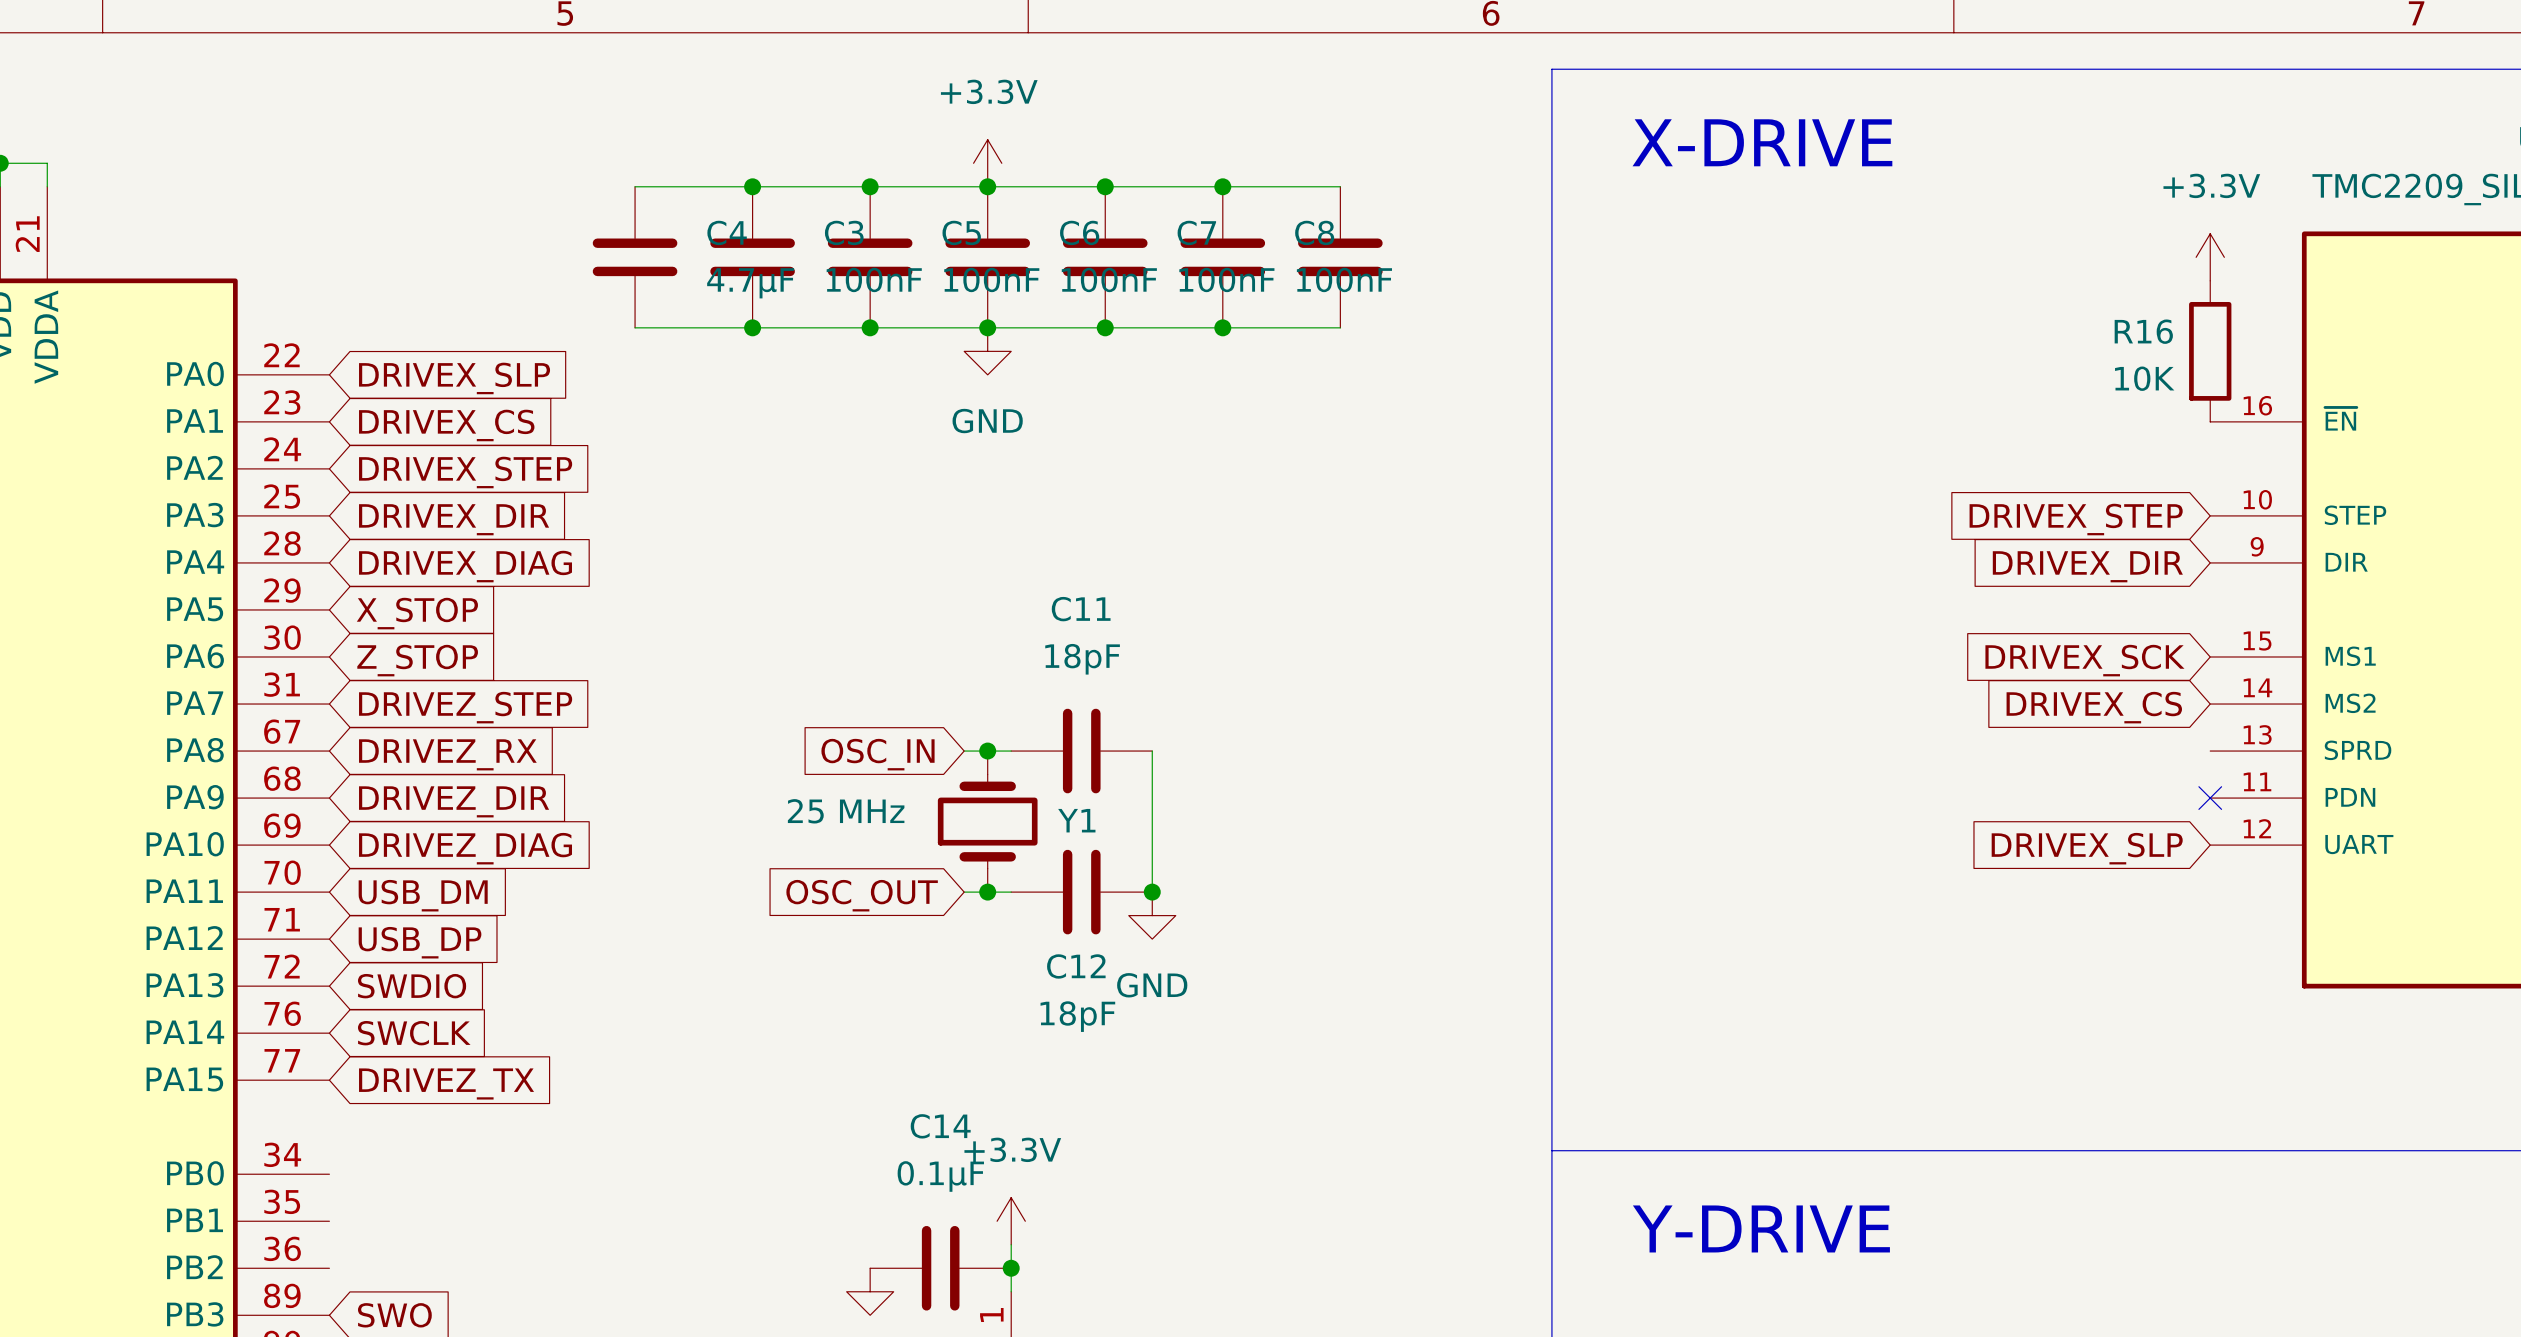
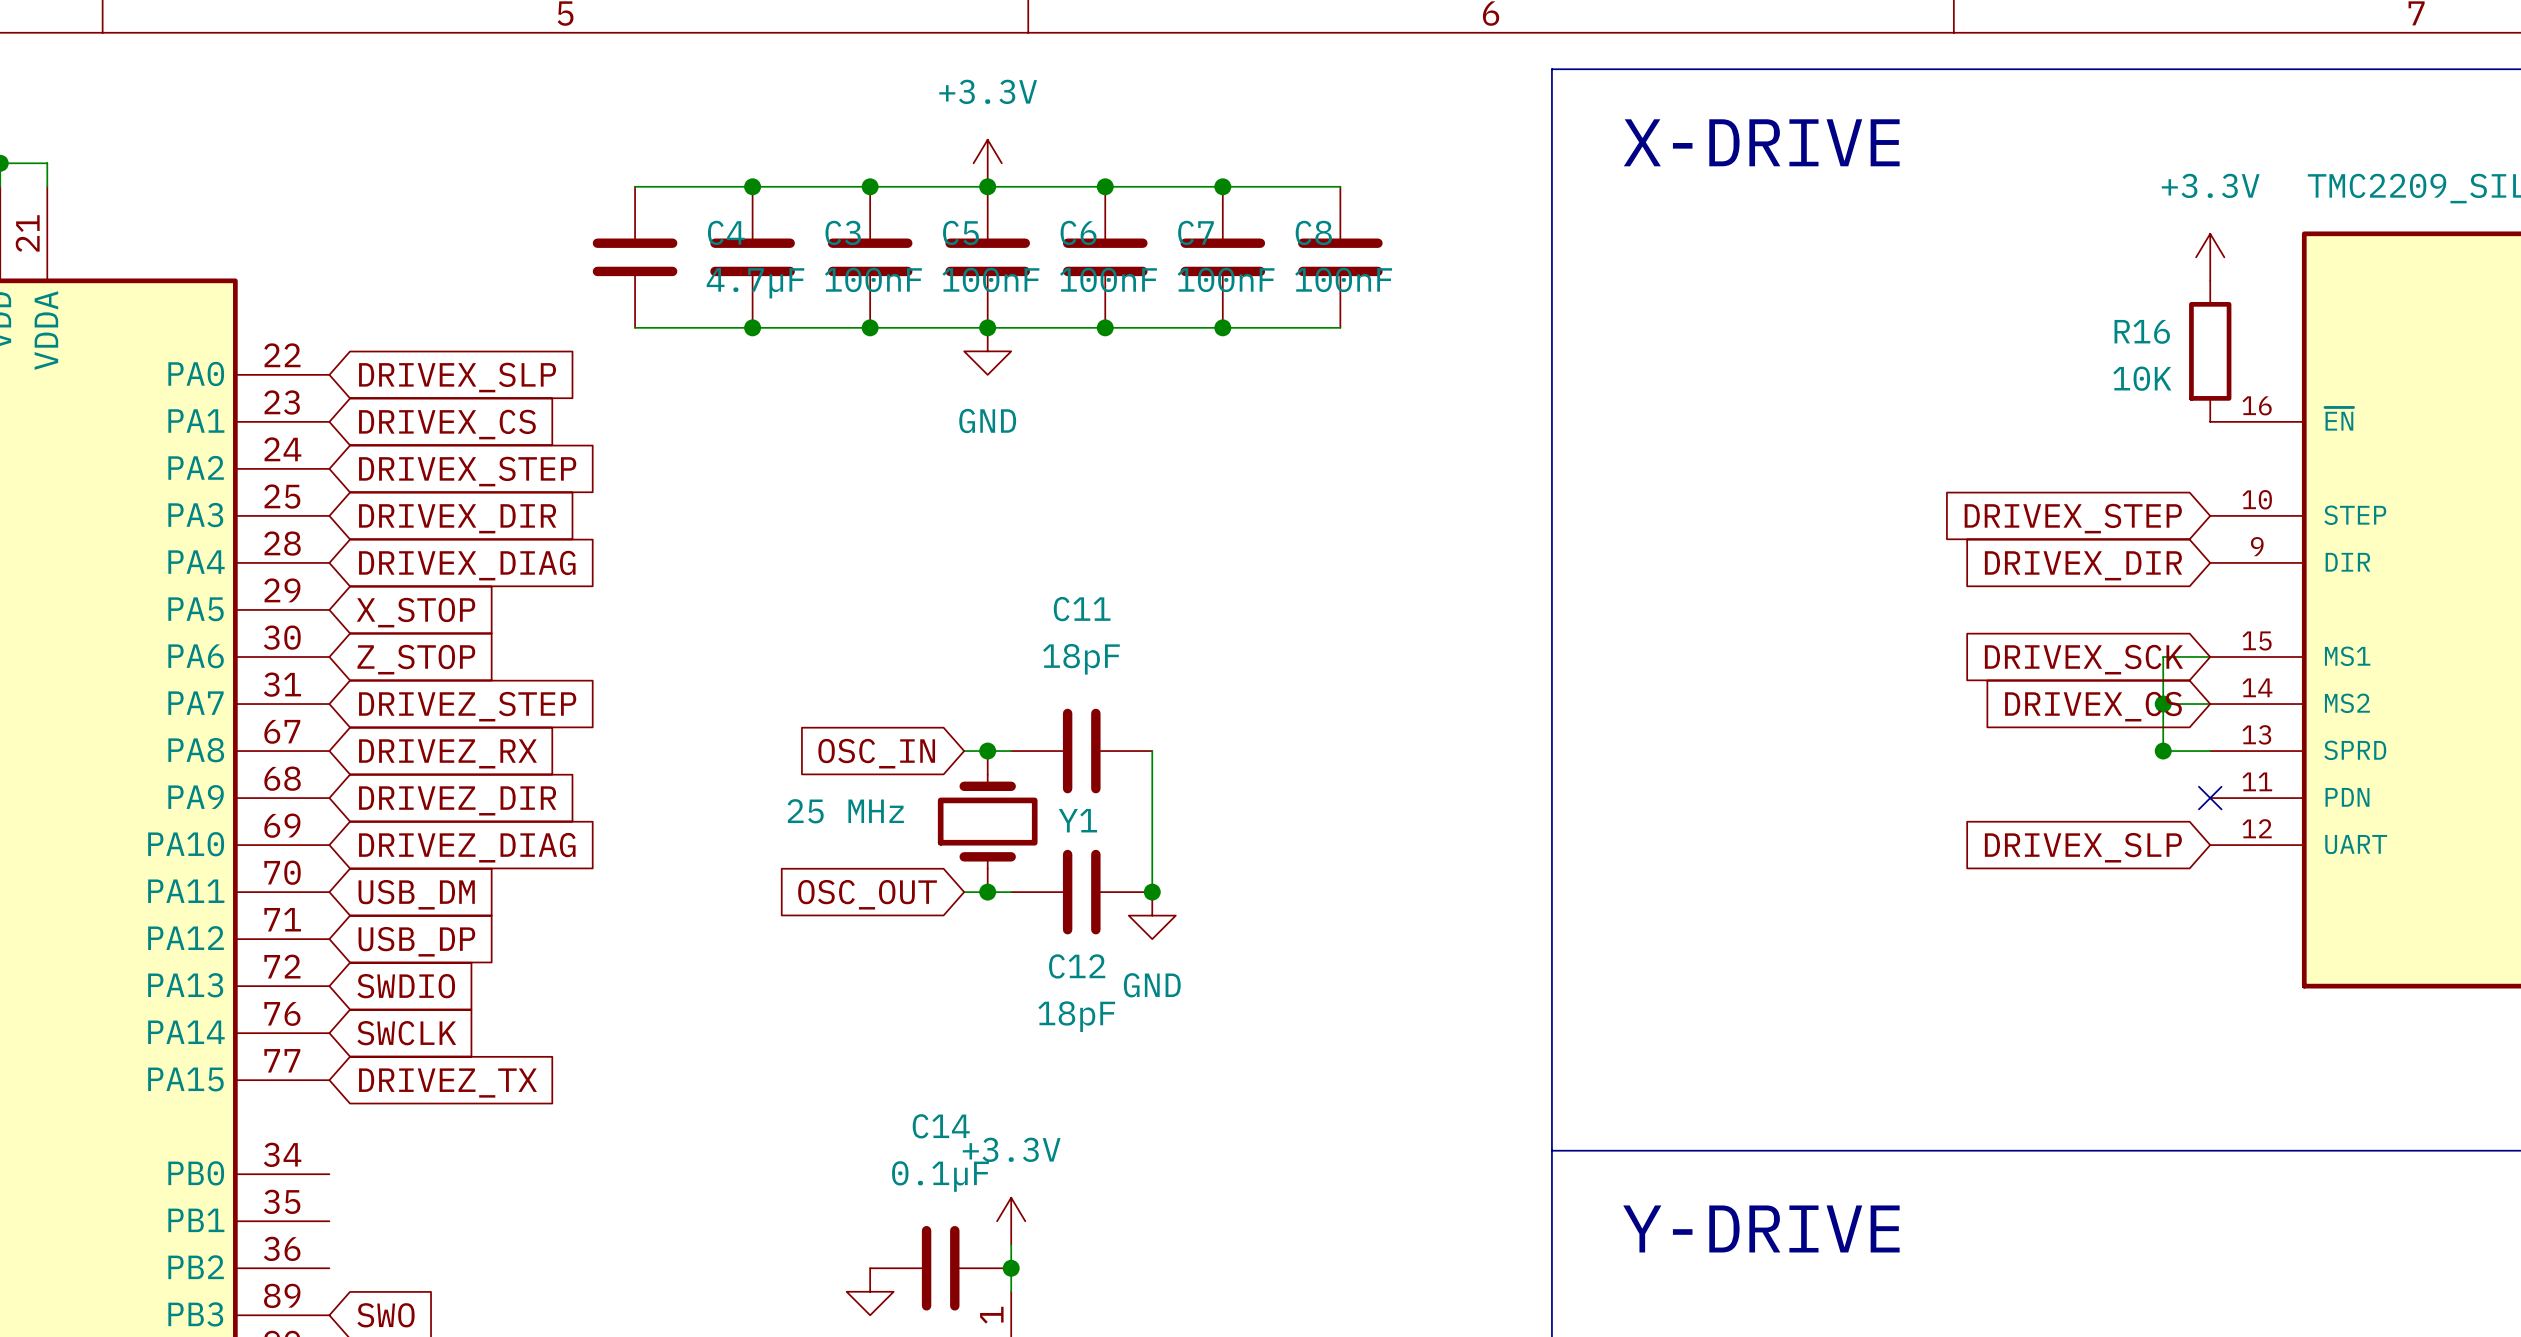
wire: none -> (2210, 656) (2163, 656) (2163, 751) (2210, 751)
wire: none -> (2163, 704) (2210, 704)
junction: none -> (2163, 704)
junction: none -> (2163, 751)

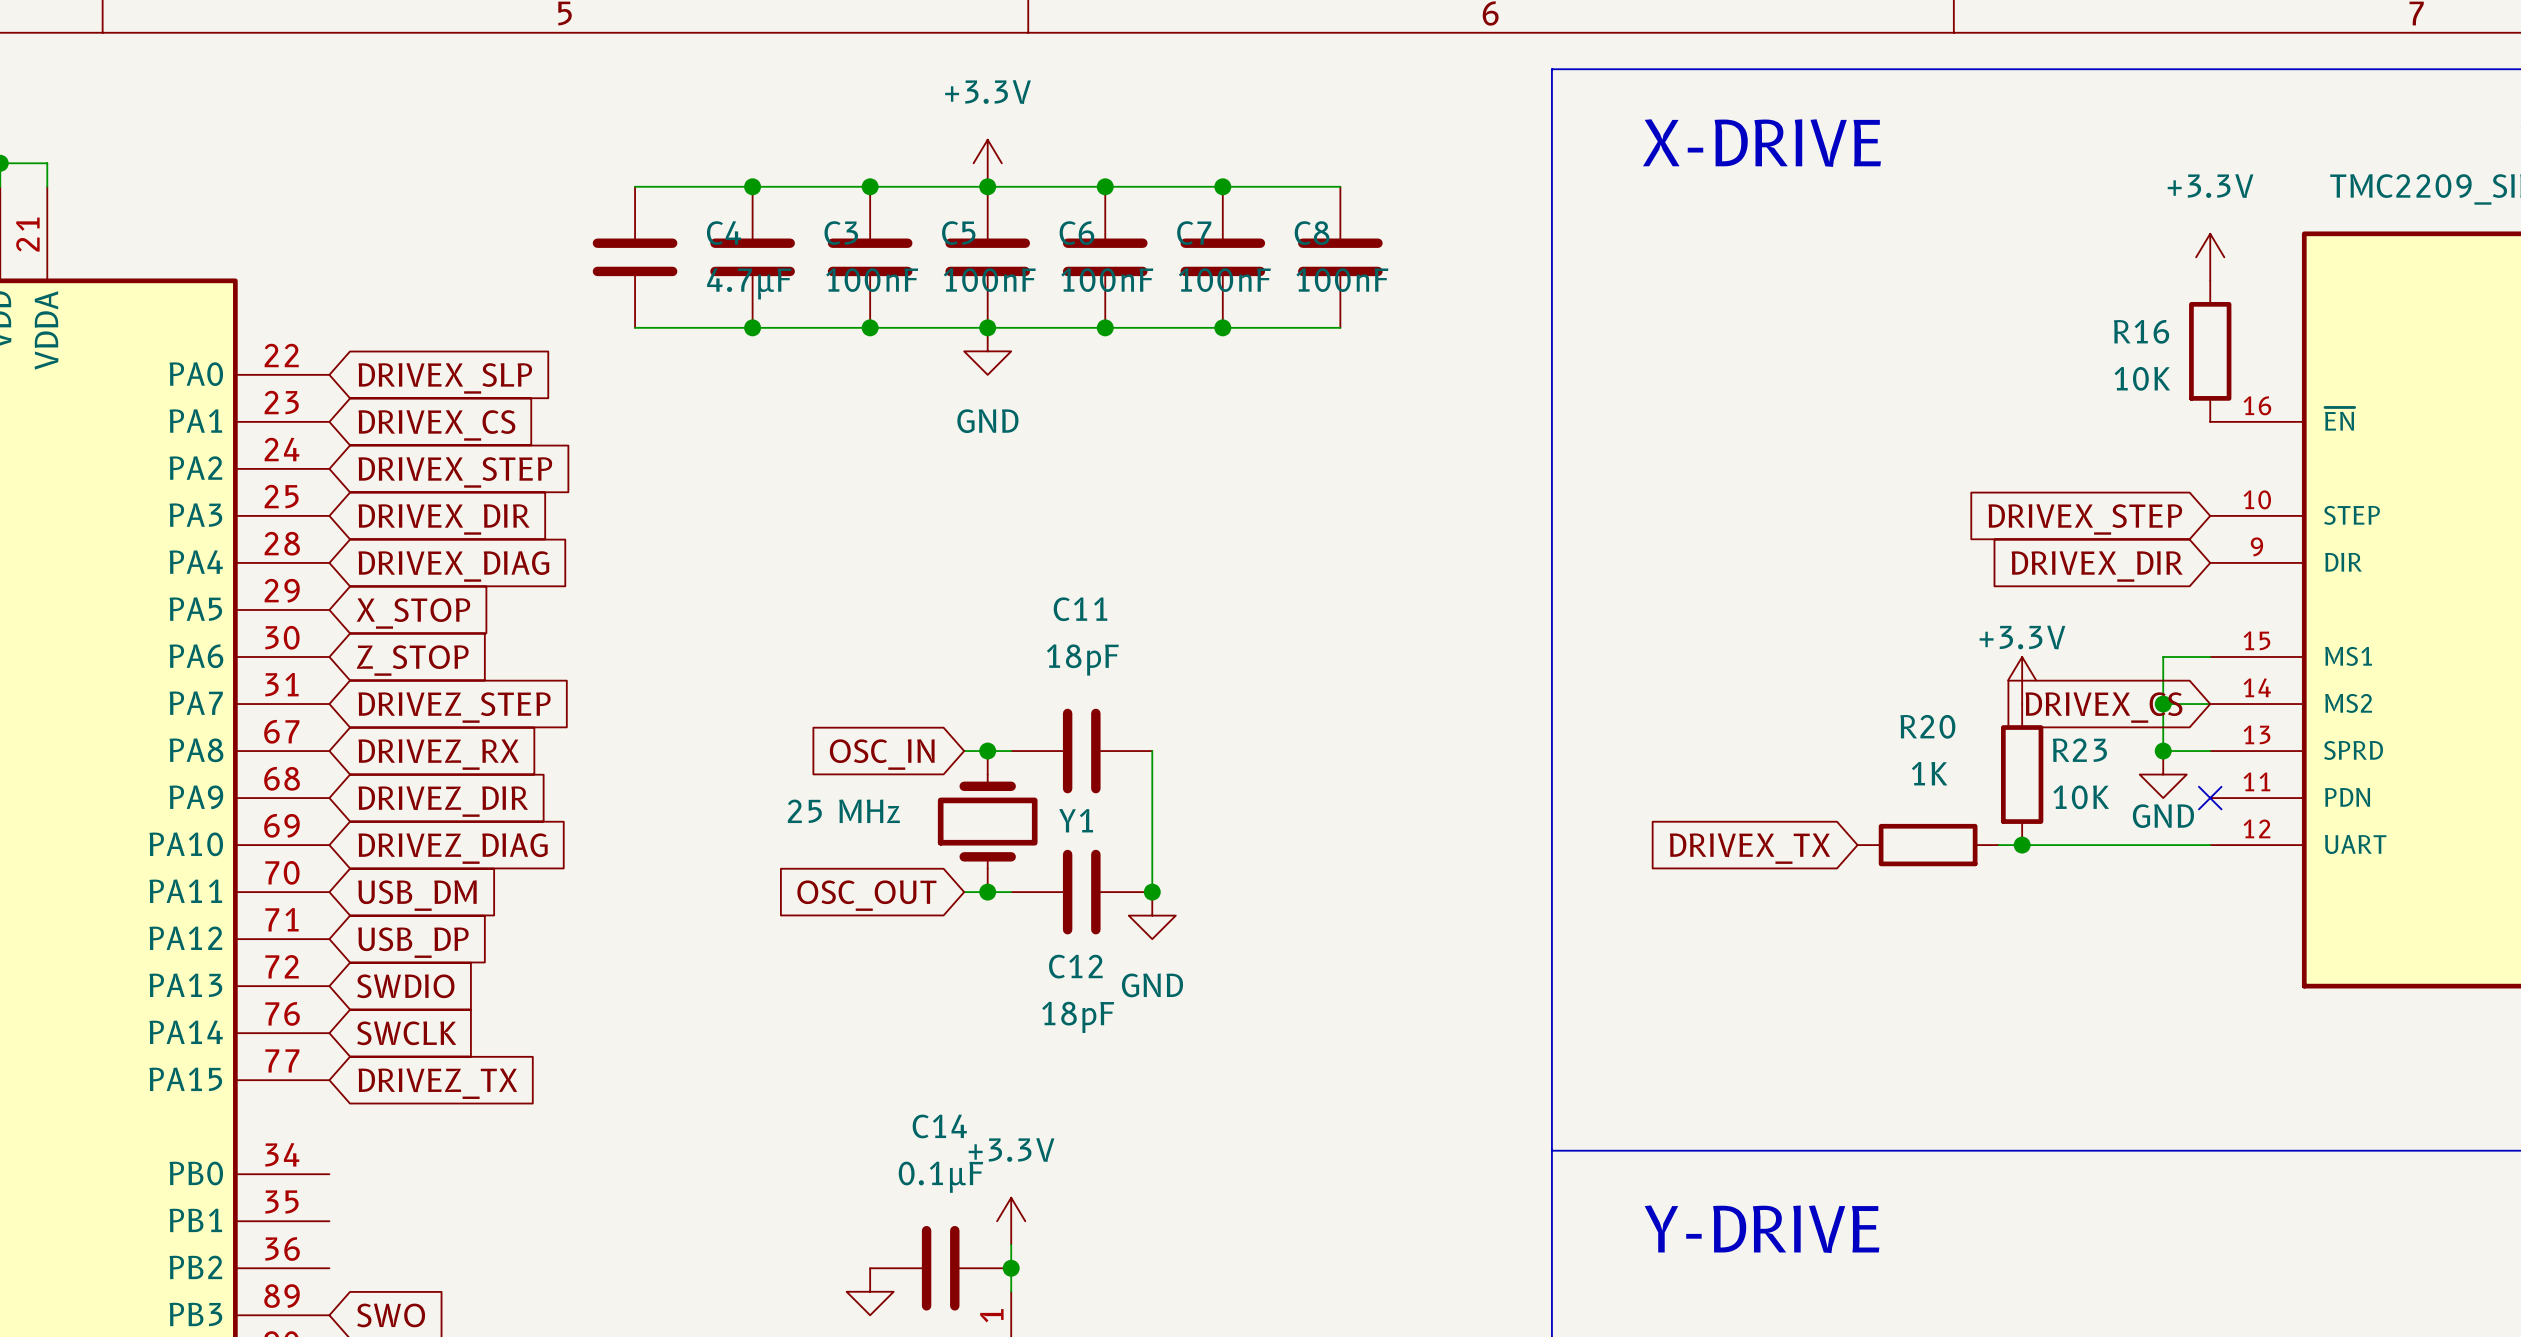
global label: DRIVEX_SCK (2083, 659) -> none
power symbol: none -> +3.3V (2022, 680)
R23: none -> 10K (2022, 774)
power symbol: none -> GND (2163, 774)
R20: none -> 1K (1928, 845)
wire: none -> (1998, 845) (2210, 845)
junction: none -> (2022, 845)
global label: none -> DRIVEX_TX (1749, 848)
global label: DRIVEX_SLP (2083, 847) -> none

